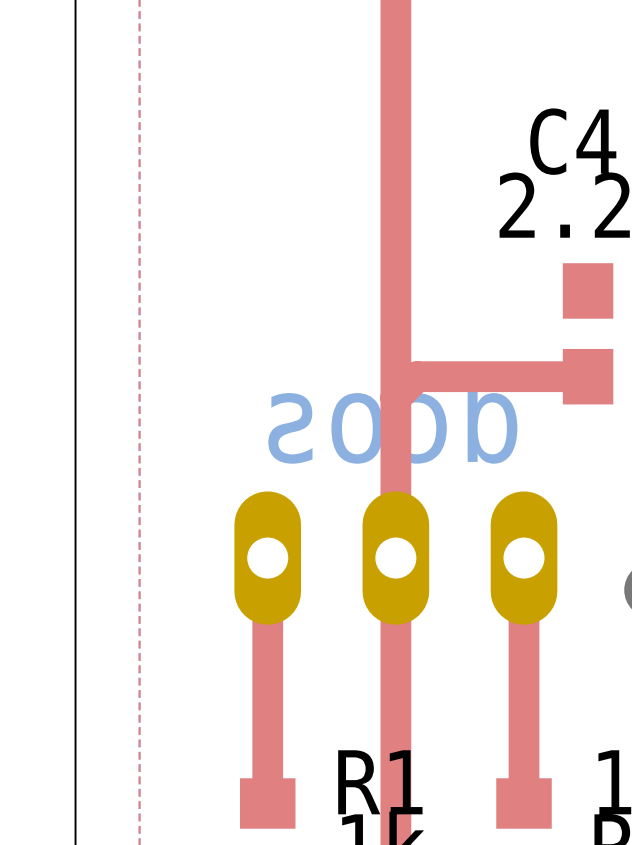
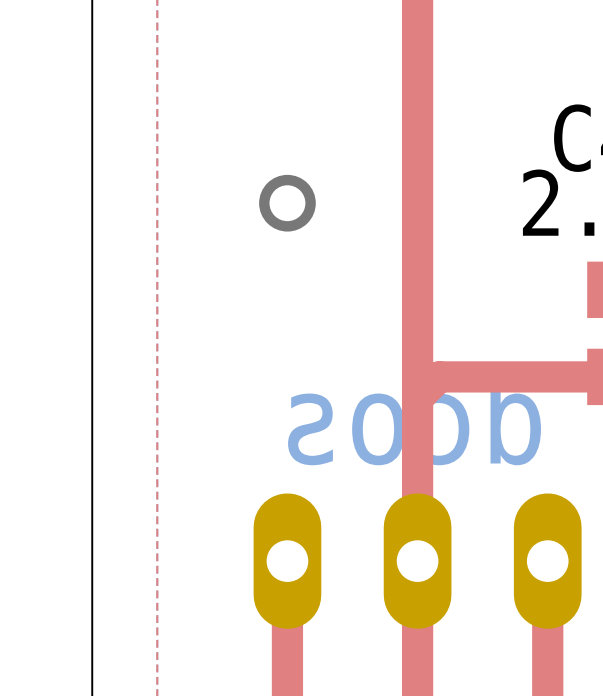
via: none -> (287, 203)

